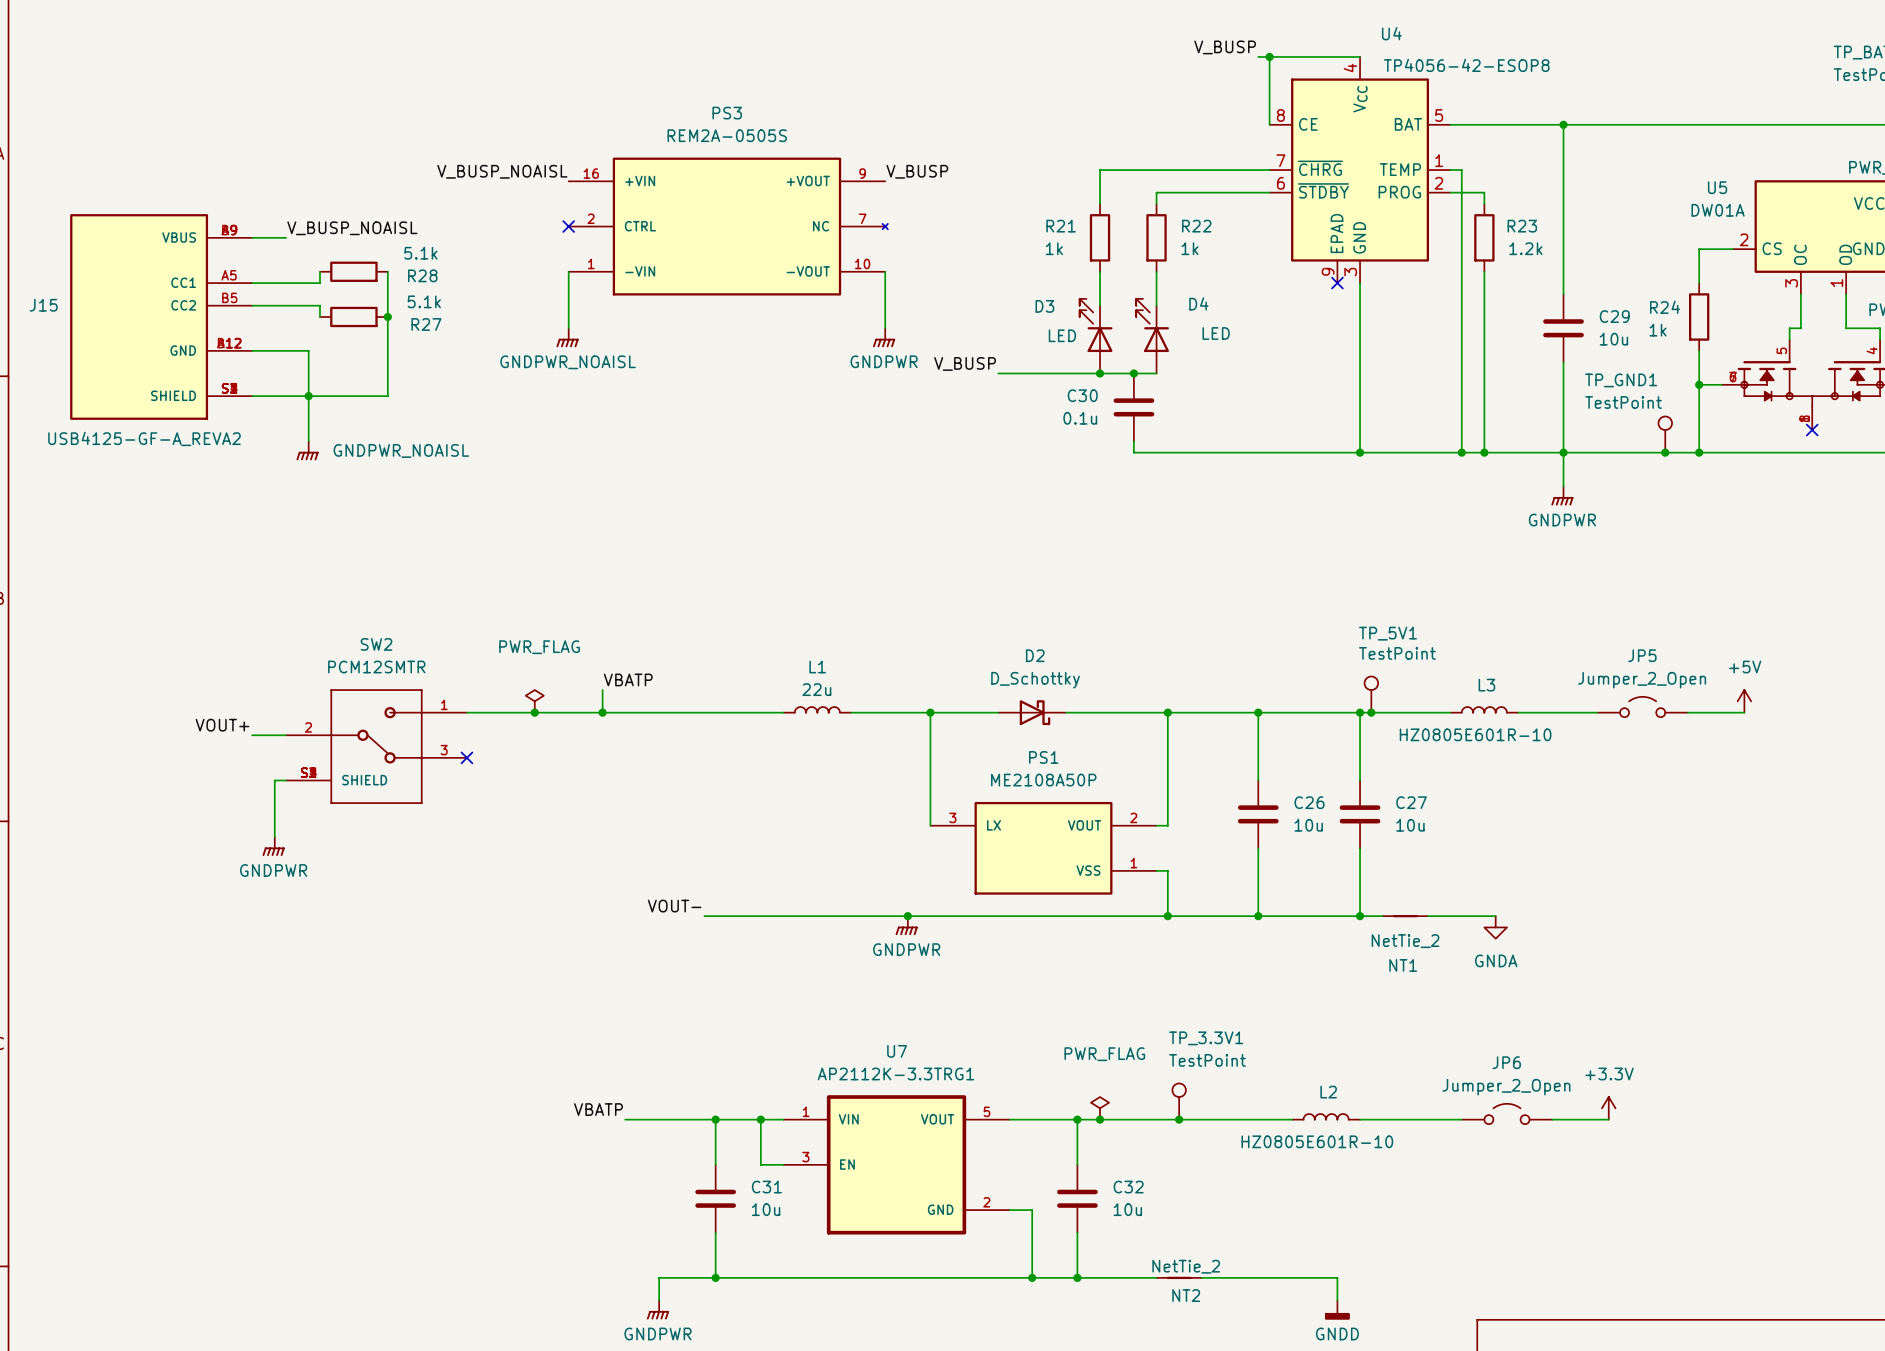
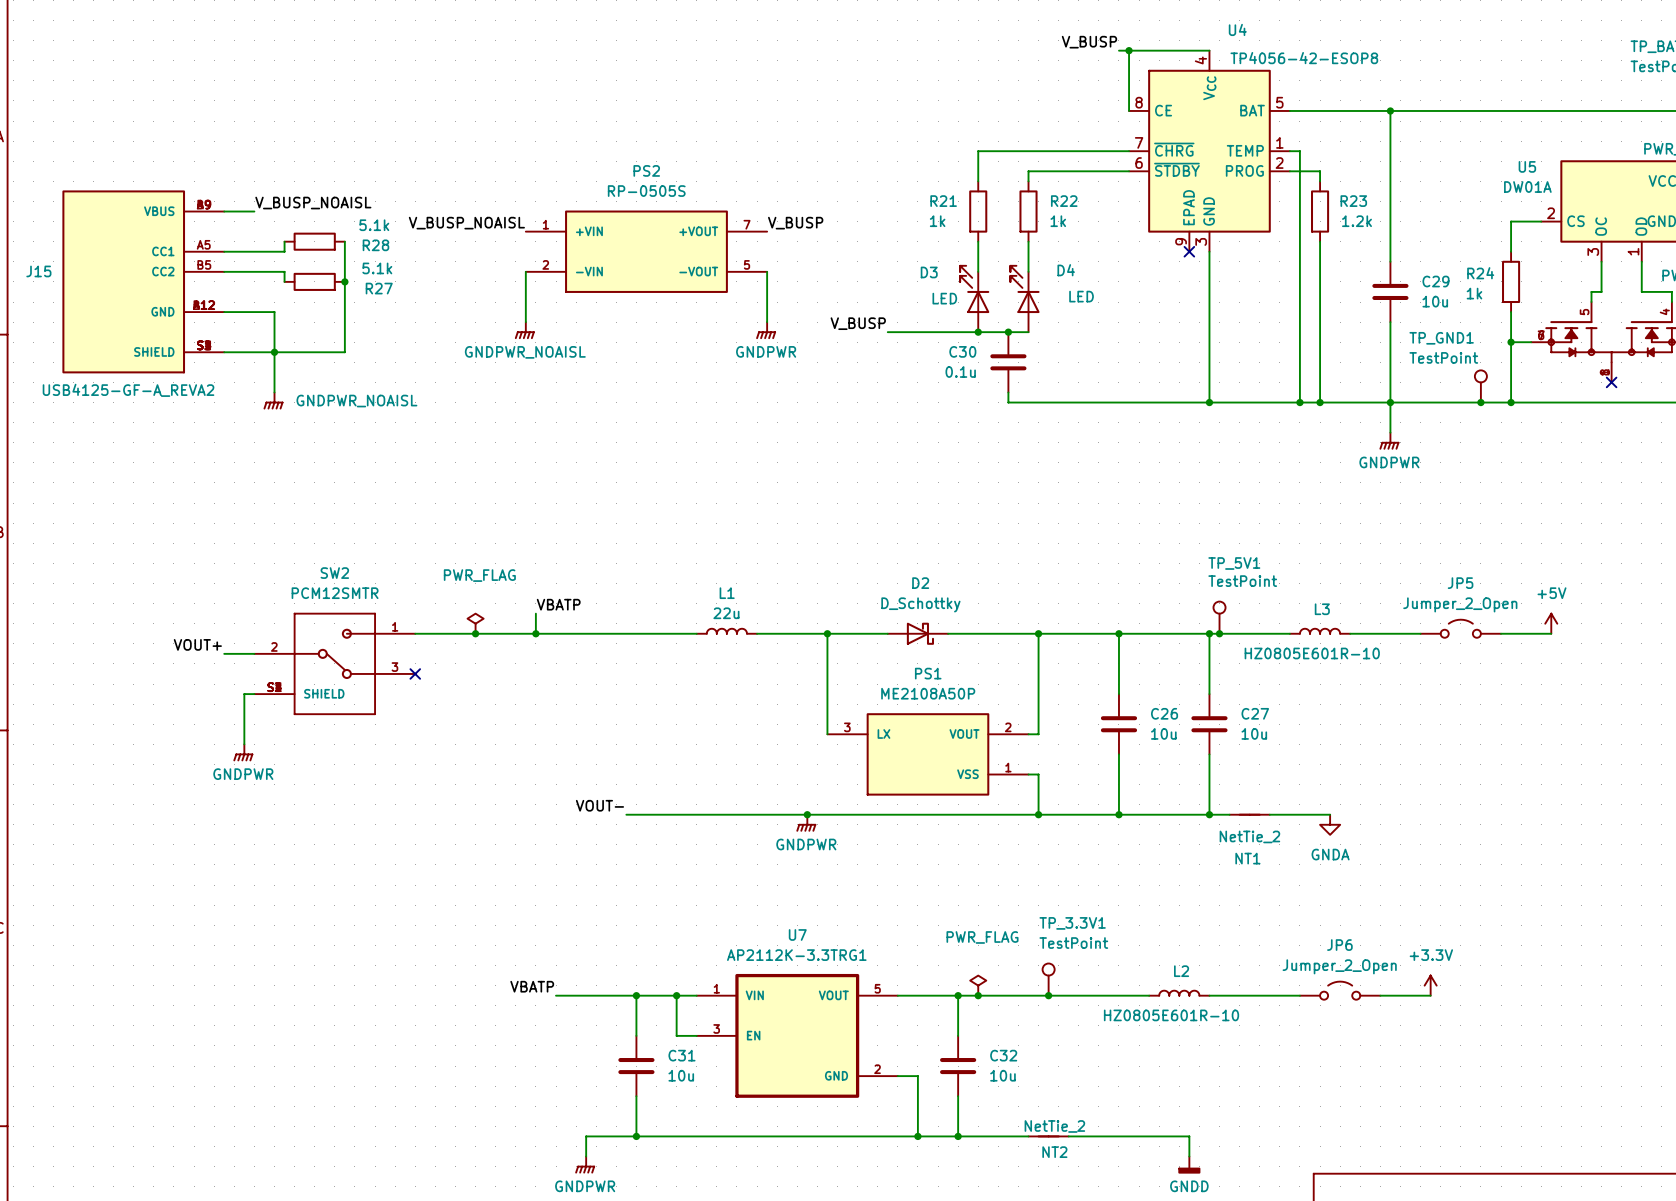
label position: V_BUSP_NOAISL (502, 171) -> V_BUSP_NOAISL (466, 223)
label position: V_BUSP (917, 171) -> V_BUSP (795, 223)
no-connect mark: (568, 226) -> none
PS3: REM2A-0505S (728, 226) -> none
wire: (568, 271) (568, 328) -> (525, 271) (525, 322)
wire: (885, 271) (885, 328) -> (767, 271) (767, 322)
PS2: none -> RP-0505S (646, 251)
power symbol position: GNDPWR_NOAISL (567, 337) -> GNDPWR_NOAISL (524, 330)
power symbol position: GNDPWR (884, 337) -> GNDPWR (766, 330)

